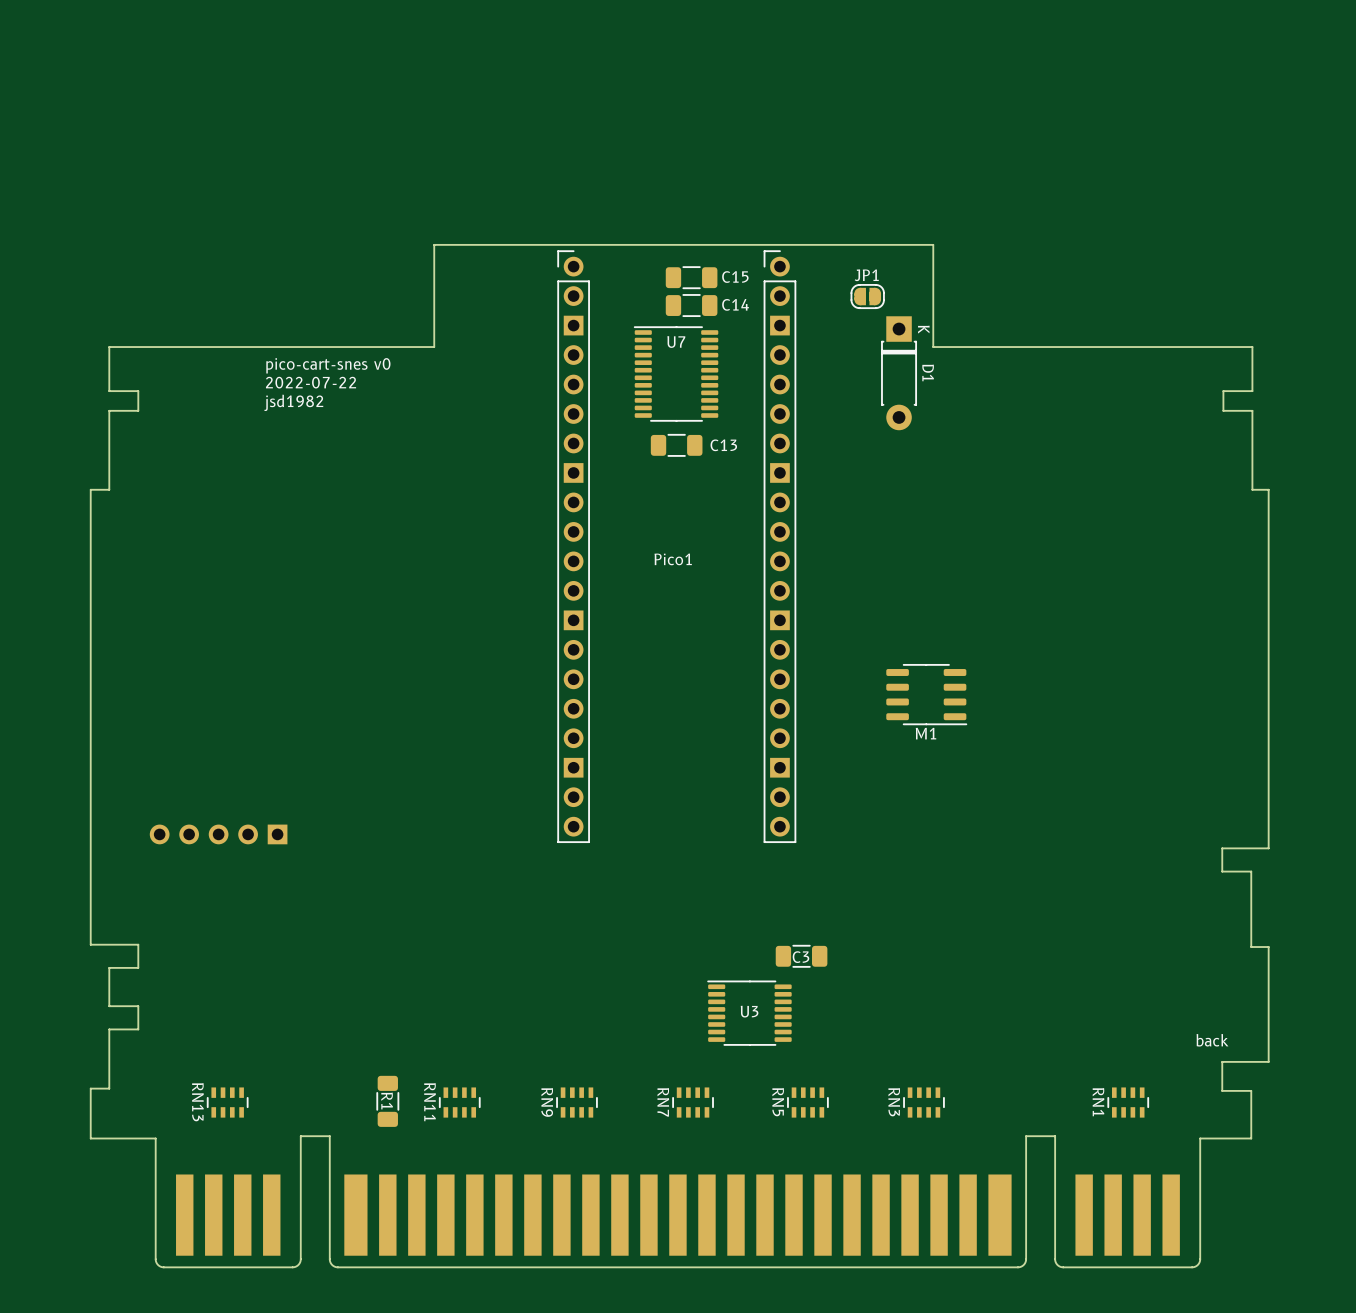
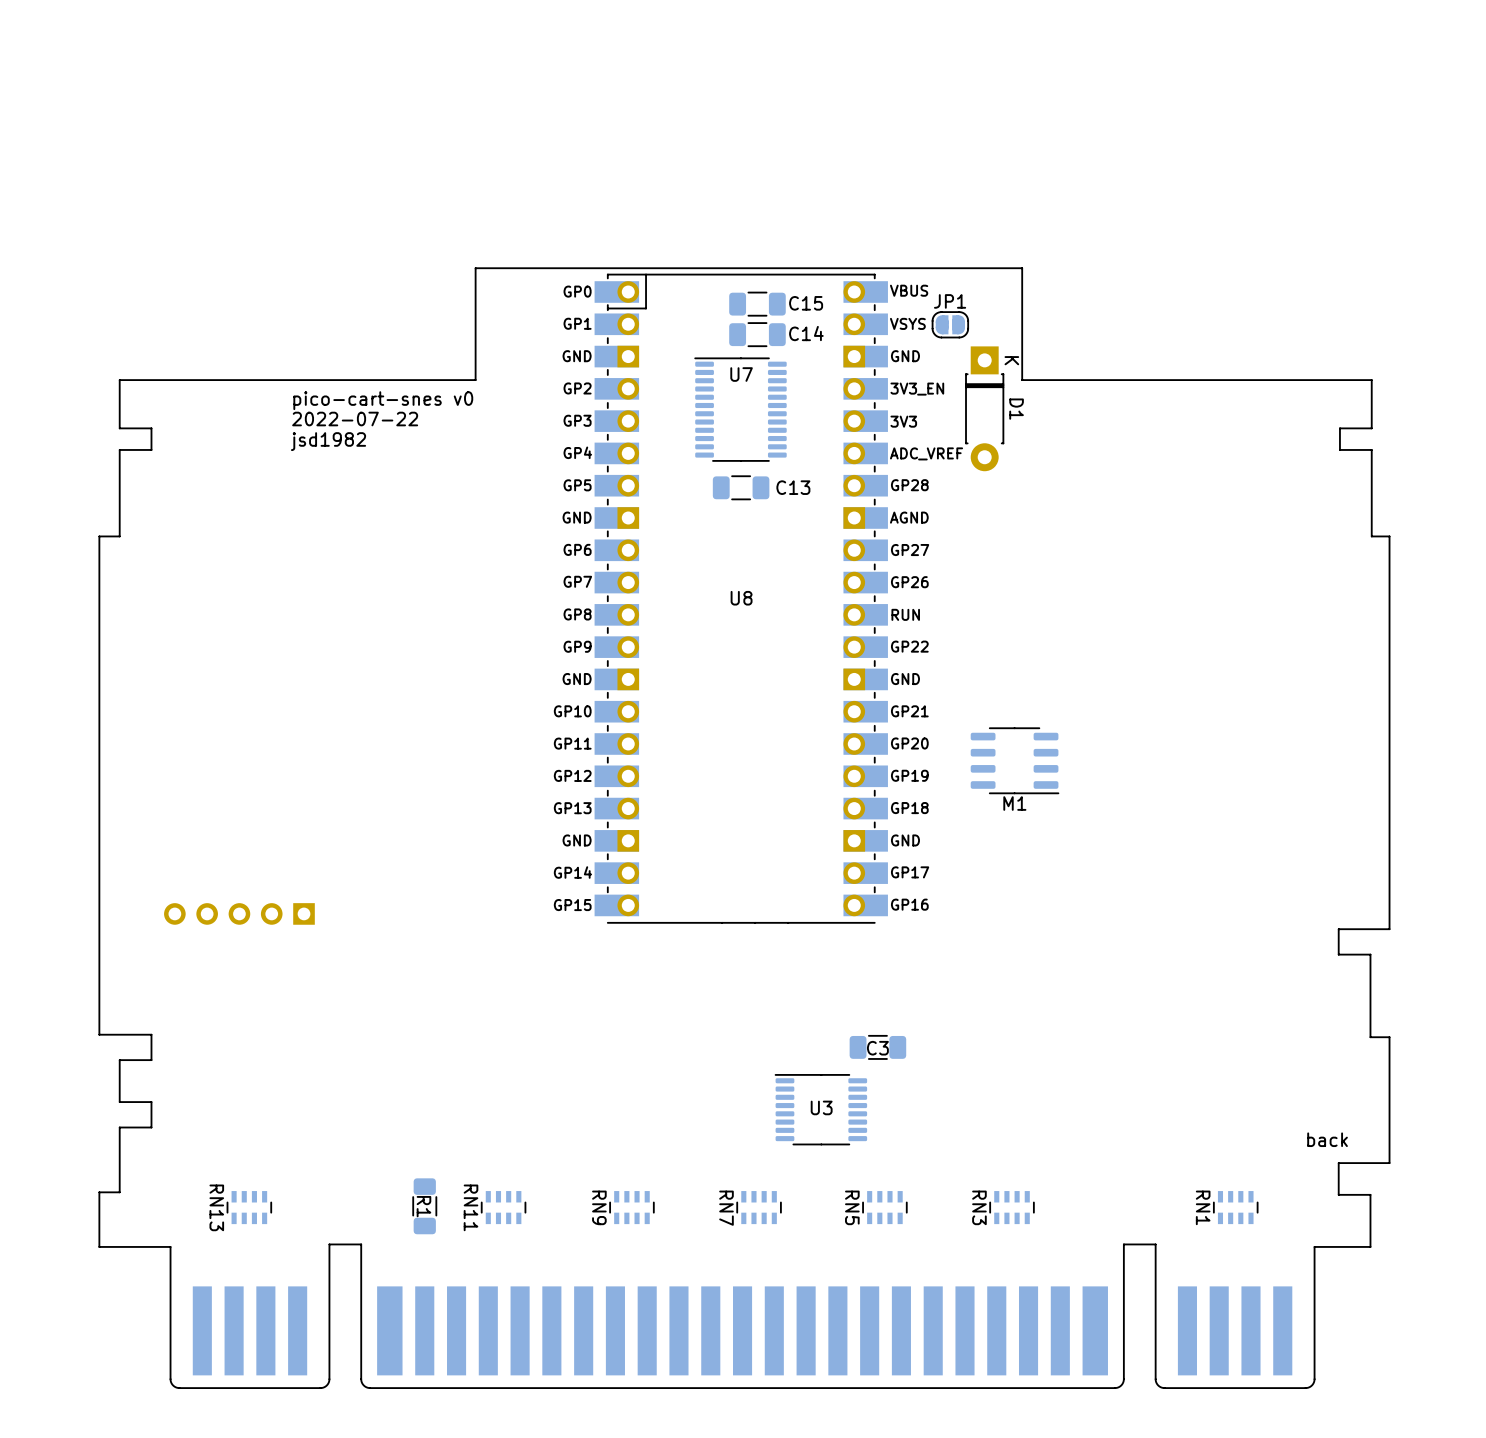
Pico1: (676, 546) -> none
U8: none -> (741, 598)

